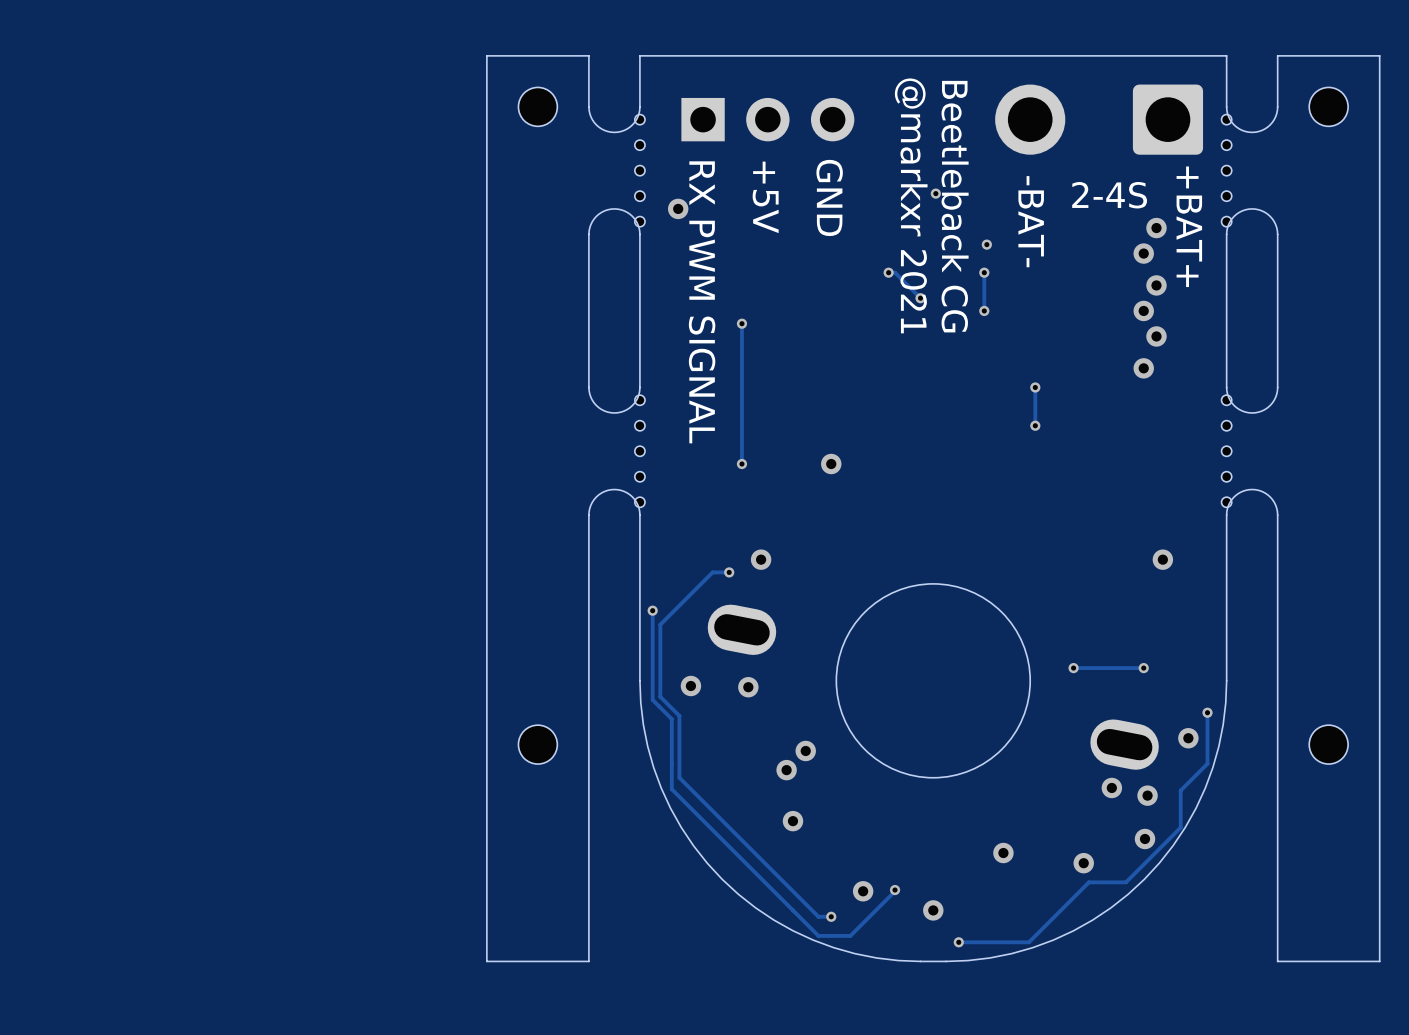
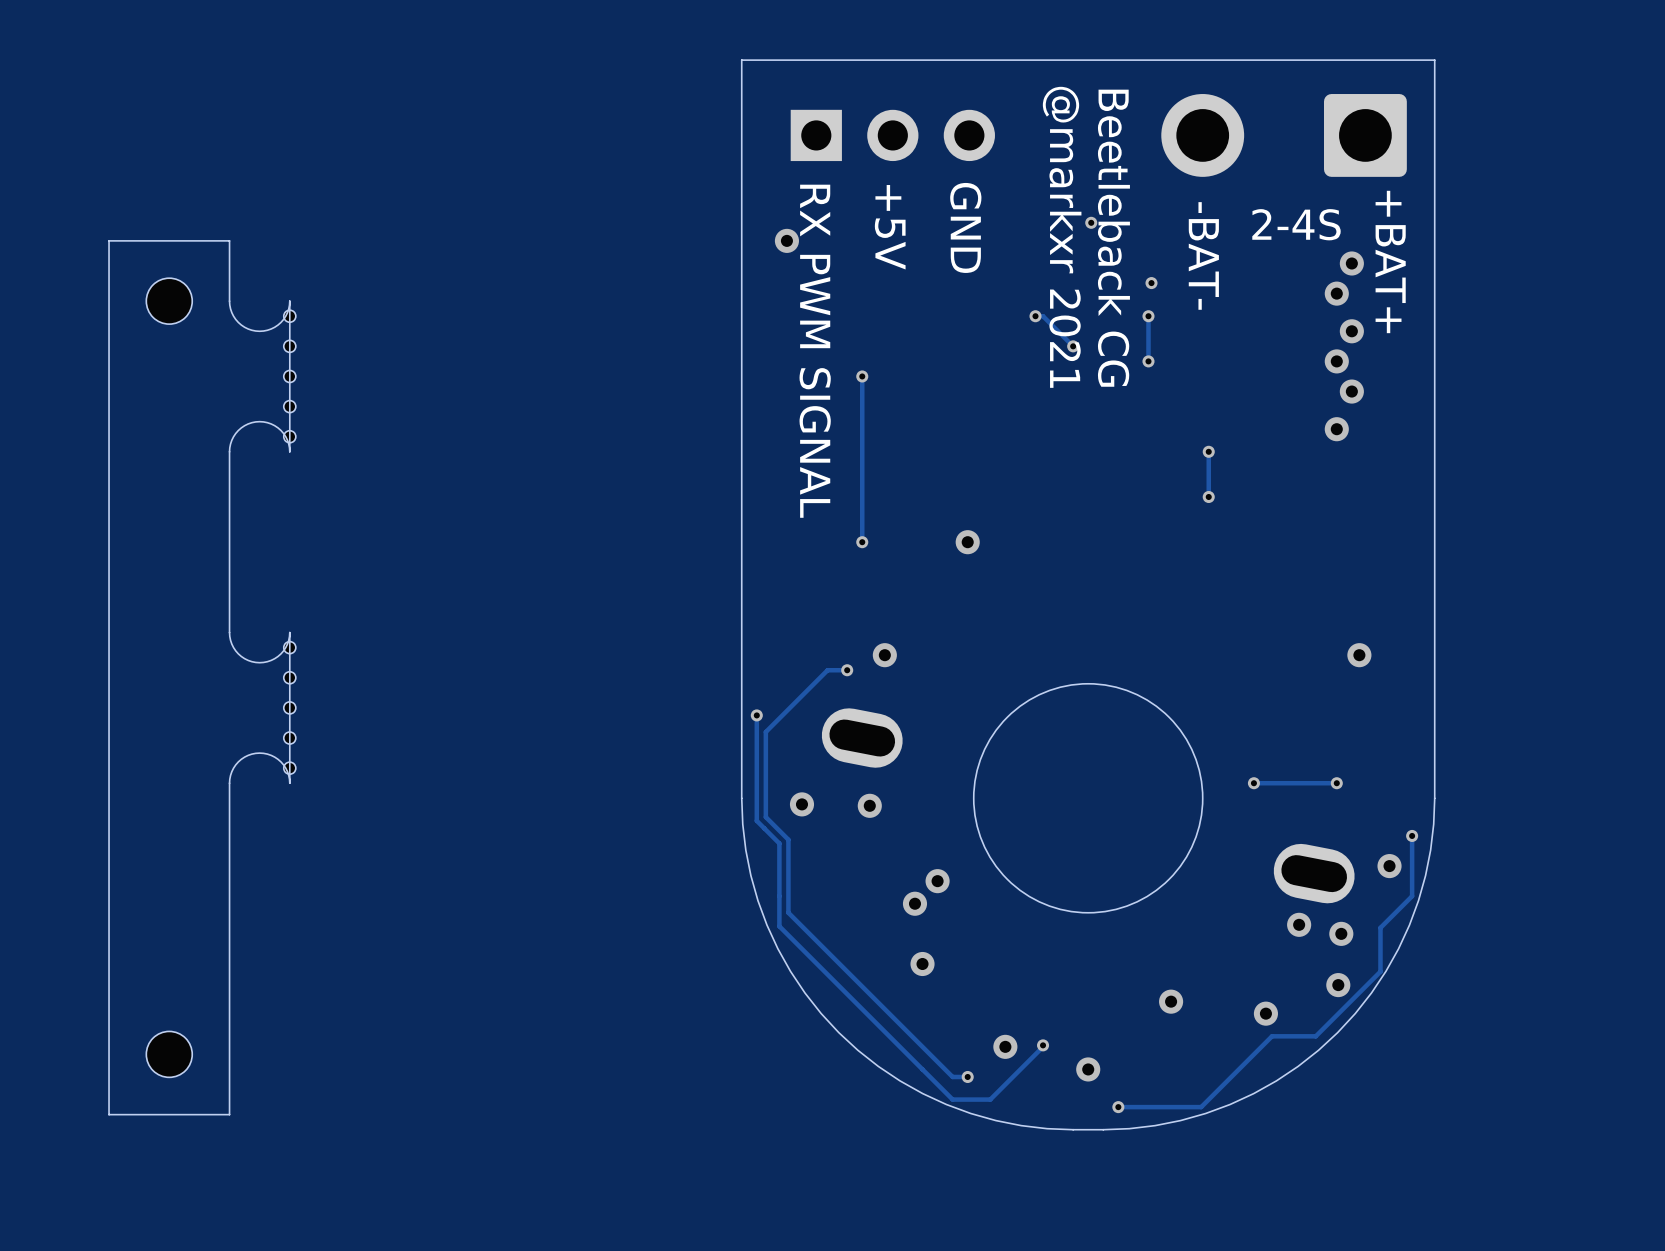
part: (537, 106) -> none
board edge: (639, 106) (637, 116) (629, 127) (621, 131) (607, 131) (596, 124) (589, 113) (588, 55) (486, 55) (486, 961) (588, 961) (589, 511) (596, 496) (604, 491) (614, 489) (624, 491) (632, 496) (637, 505) (639, 515) -> (741, 120) (741, 271)
board edge: (1226, 106) (1228, 116) (1236, 127) (1245, 131) (1258, 131) (1270, 124) (1276, 113) (1277, 55) (1379, 55) (1379, 961) (1277, 961) (1277, 511) (1270, 496) (1261, 491) (1252, 489) (1242, 491) (1234, 496) (1228, 505) (1226, 515) -> (1434, 120) (1434, 271)
part: (1328, 106) -> none
part: (639, 170) -> none
part: (1226, 170) -> none
board edge: none -> (229, 240) (229, 305) (231, 312) (238, 322) (251, 330) (259, 331) (271, 328) (283, 319) (287, 312) (289, 301) (289, 451) (287, 440) (280, 430) (271, 423) (259, 421) (248, 423) (238, 430) (231, 440) (229, 451) (229, 636) (233, 647) (241, 656) (251, 661) (263, 662) (274, 658) (280, 653) (287, 644) (289, 632) (289, 783) (287, 771) (280, 761) (274, 757) (263, 753) (251, 754) (241, 759) (233, 768) (229, 779) (229, 1114) (109, 1114) (109, 240) (229, 240)
board edge: (639, 234) (637, 224) (632, 216) (624, 210) (614, 208) (604, 210) (596, 216) (590, 224) (588, 234) (589, 394) (598, 407) (607, 412) (617, 412) (632, 405) (637, 397) (639, 387) -> (741, 602) (741, 451)
board edge: (1226, 234) (1228, 224) (1234, 216) (1242, 210) (1252, 208) (1261, 210) (1270, 216) (1275, 224) (1277, 234) (1276, 394) (1267, 407) (1258, 412) (1248, 412) (1234, 405) (1228, 397) (1226, 387) -> (1434, 602) (1434, 451)
part: none -> (169, 301)
part: none -> (289, 376)
part: (639, 451) -> none
part: (1226, 451) -> none
part: none -> (289, 707)
part: (537, 744) -> none
part: (1328, 744) -> none
part: none -> (169, 1054)

